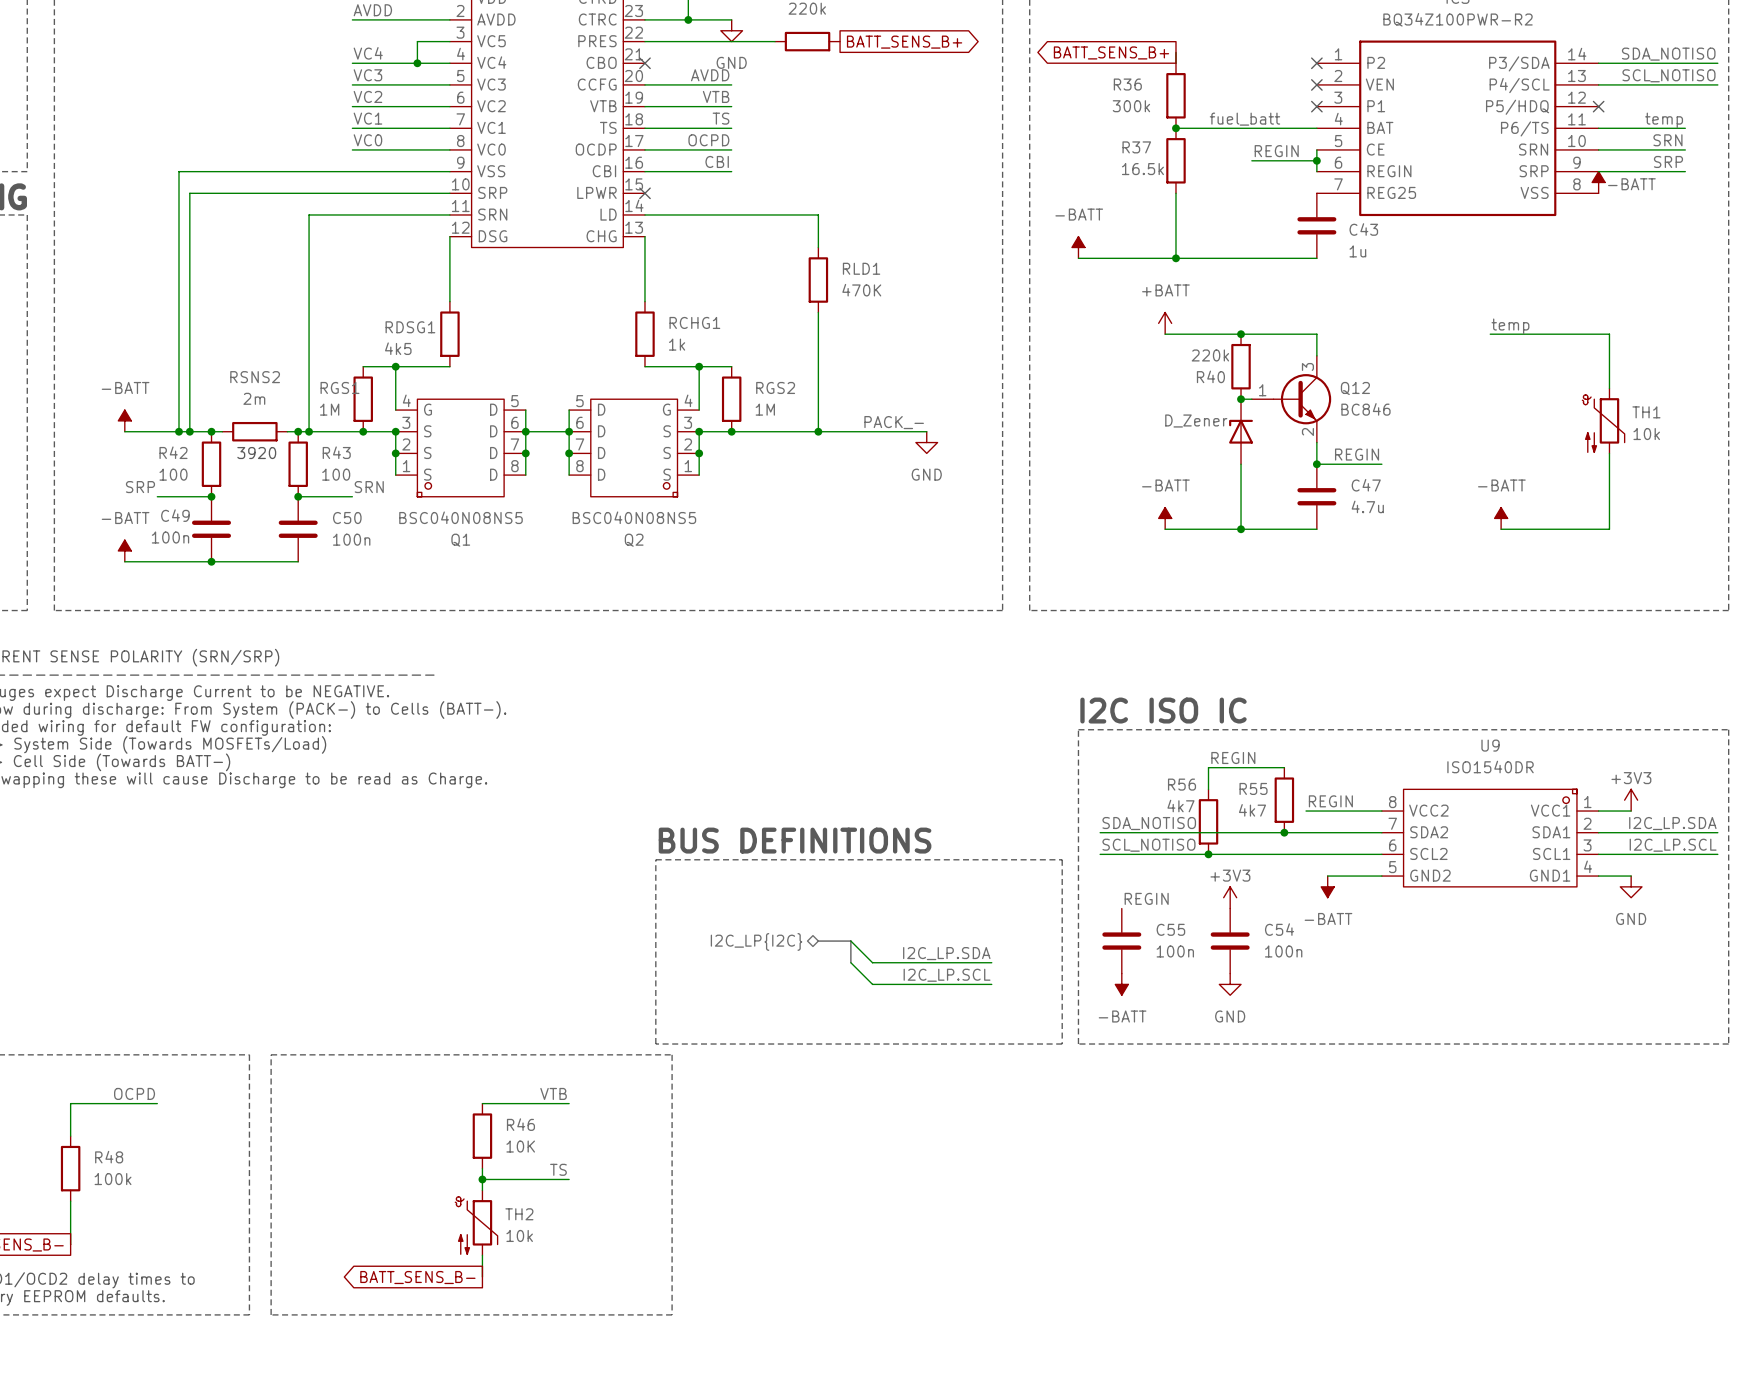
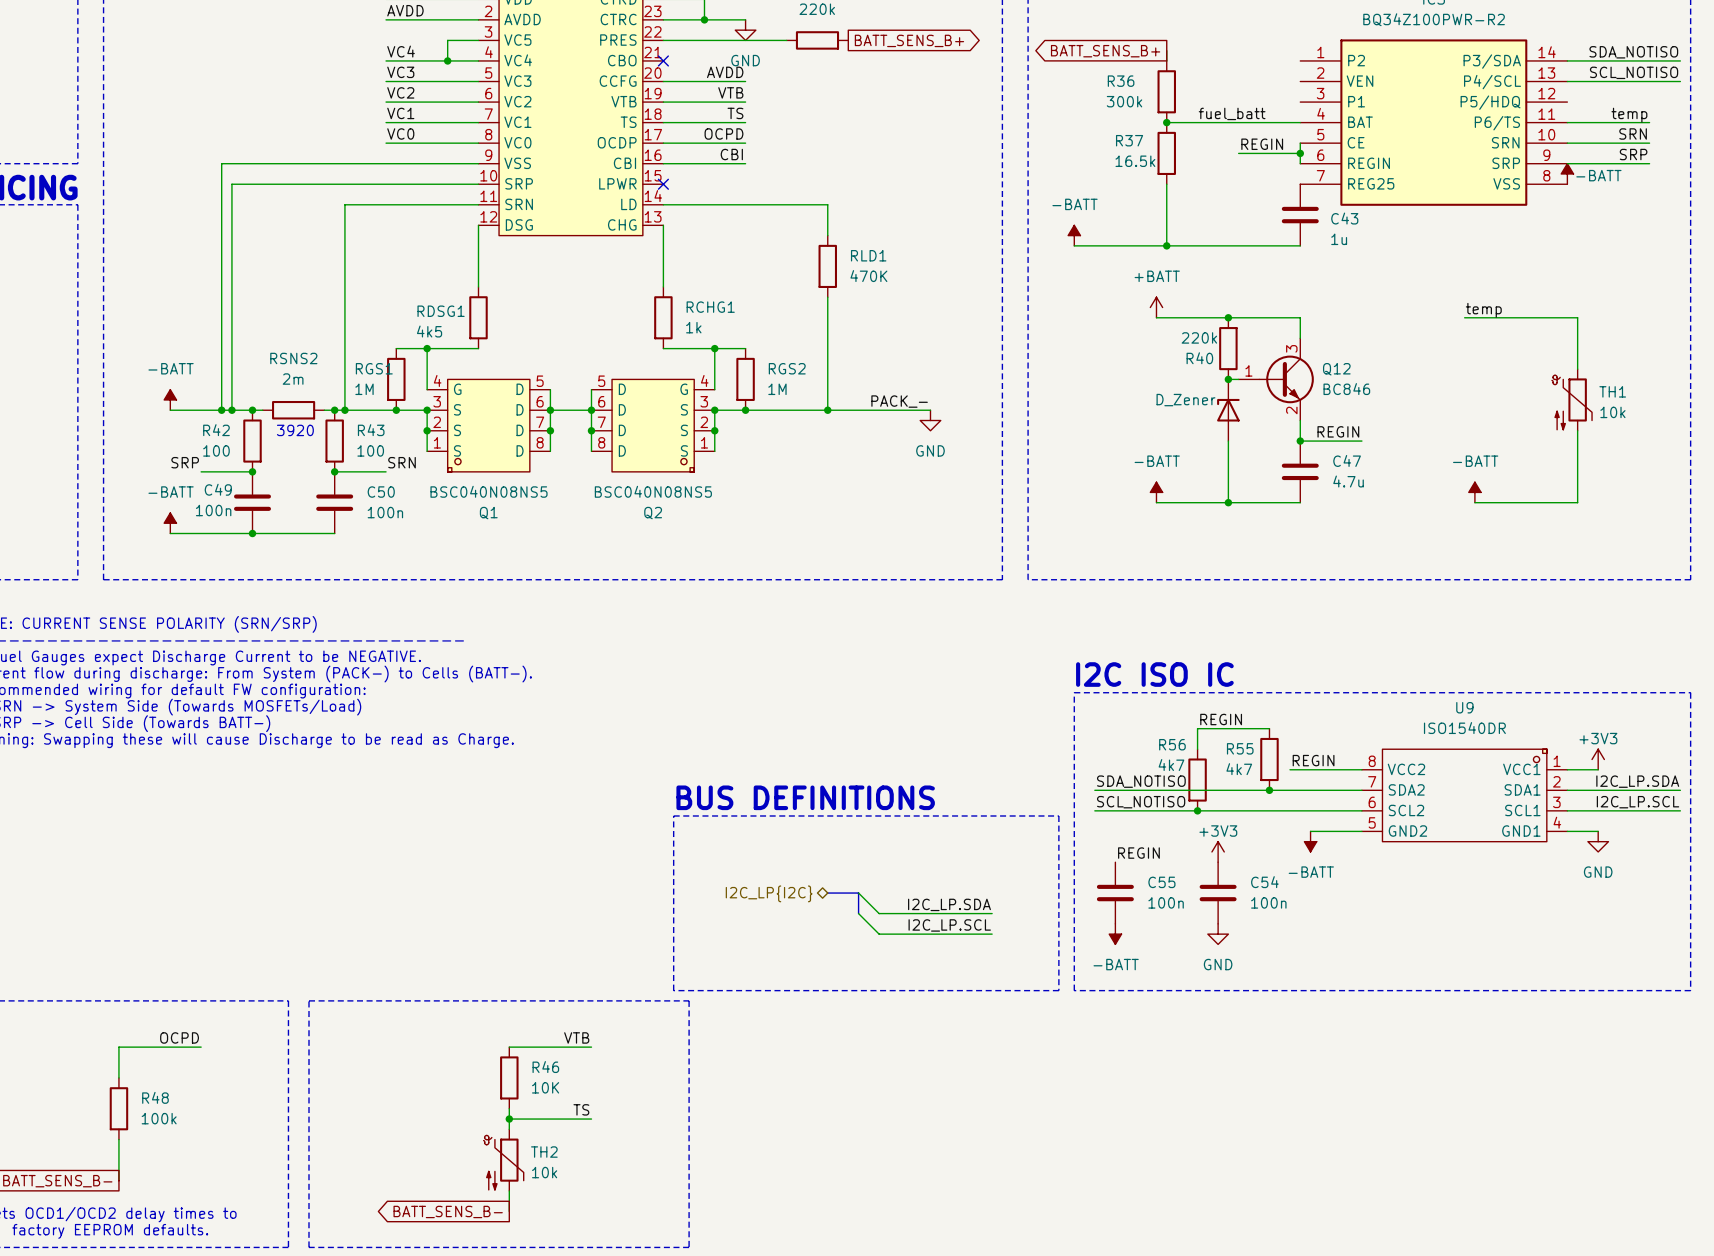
no-connect mark: (1316, 63) -> none
no-connect mark: (1316, 84) -> none
no-connect mark: (1316, 106) -> none
no-connect mark: (1598, 106) -> none

